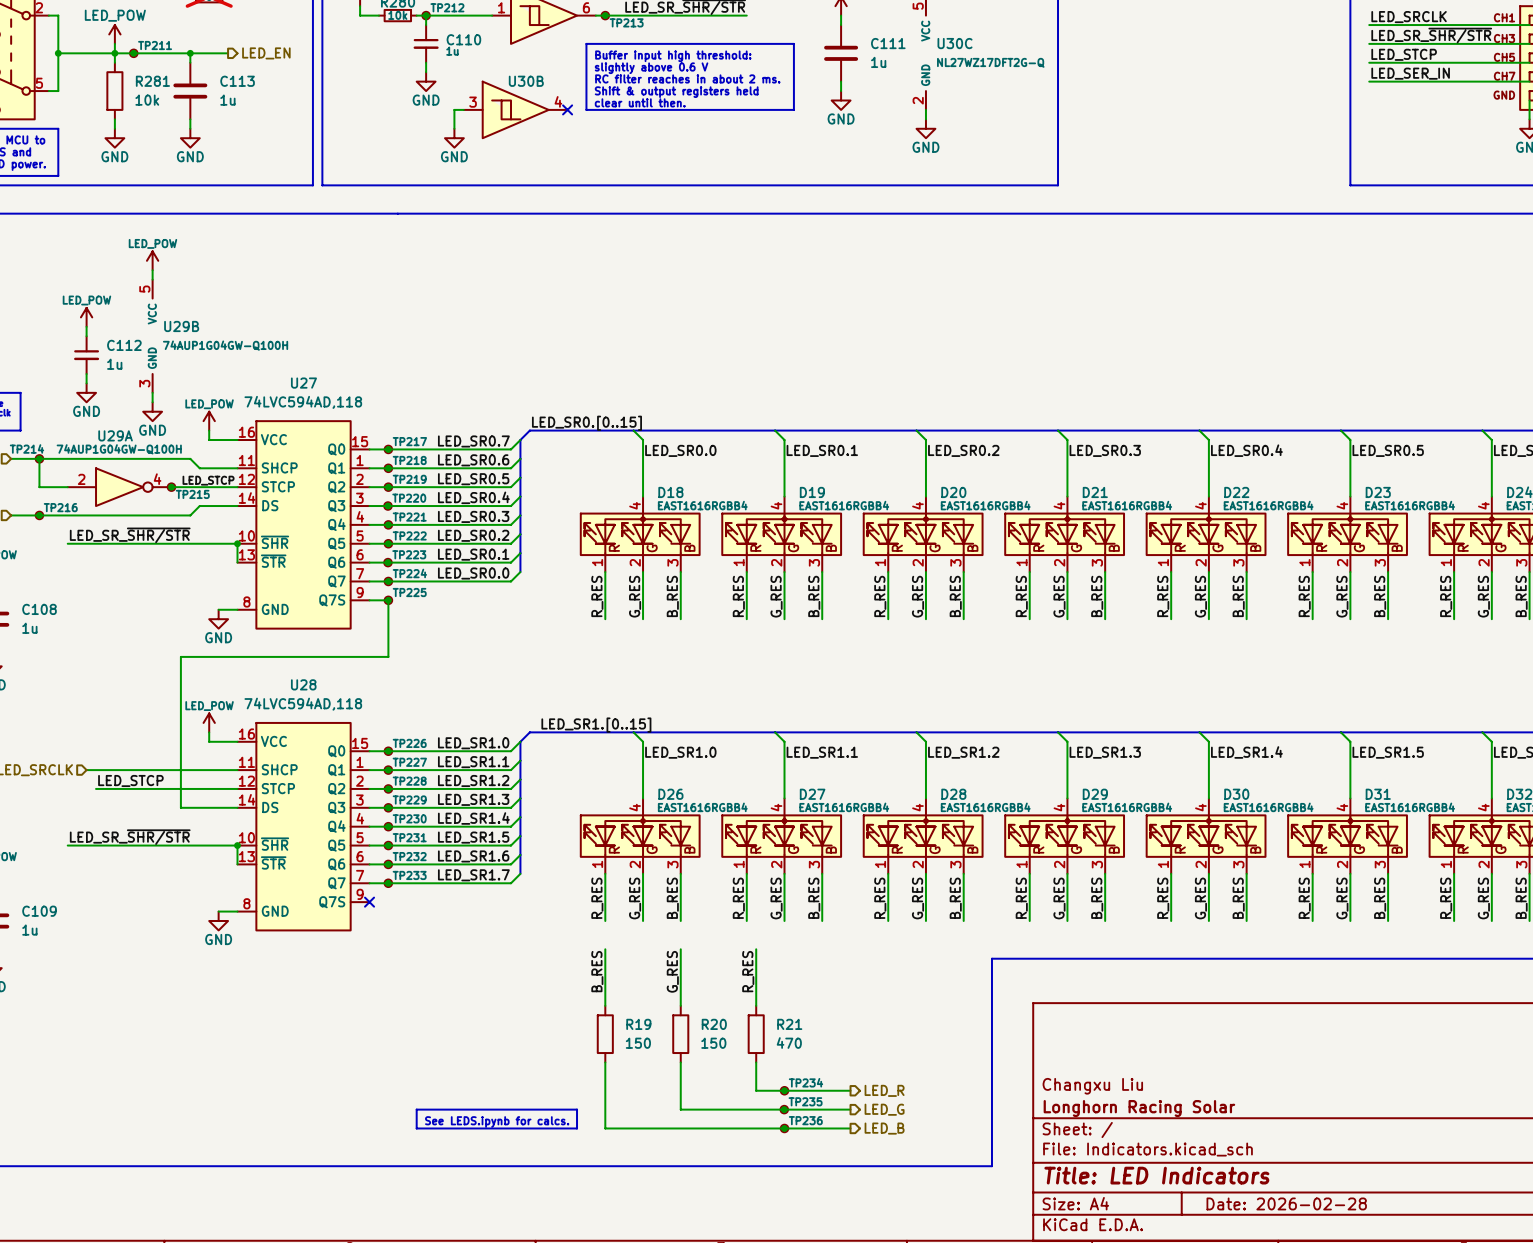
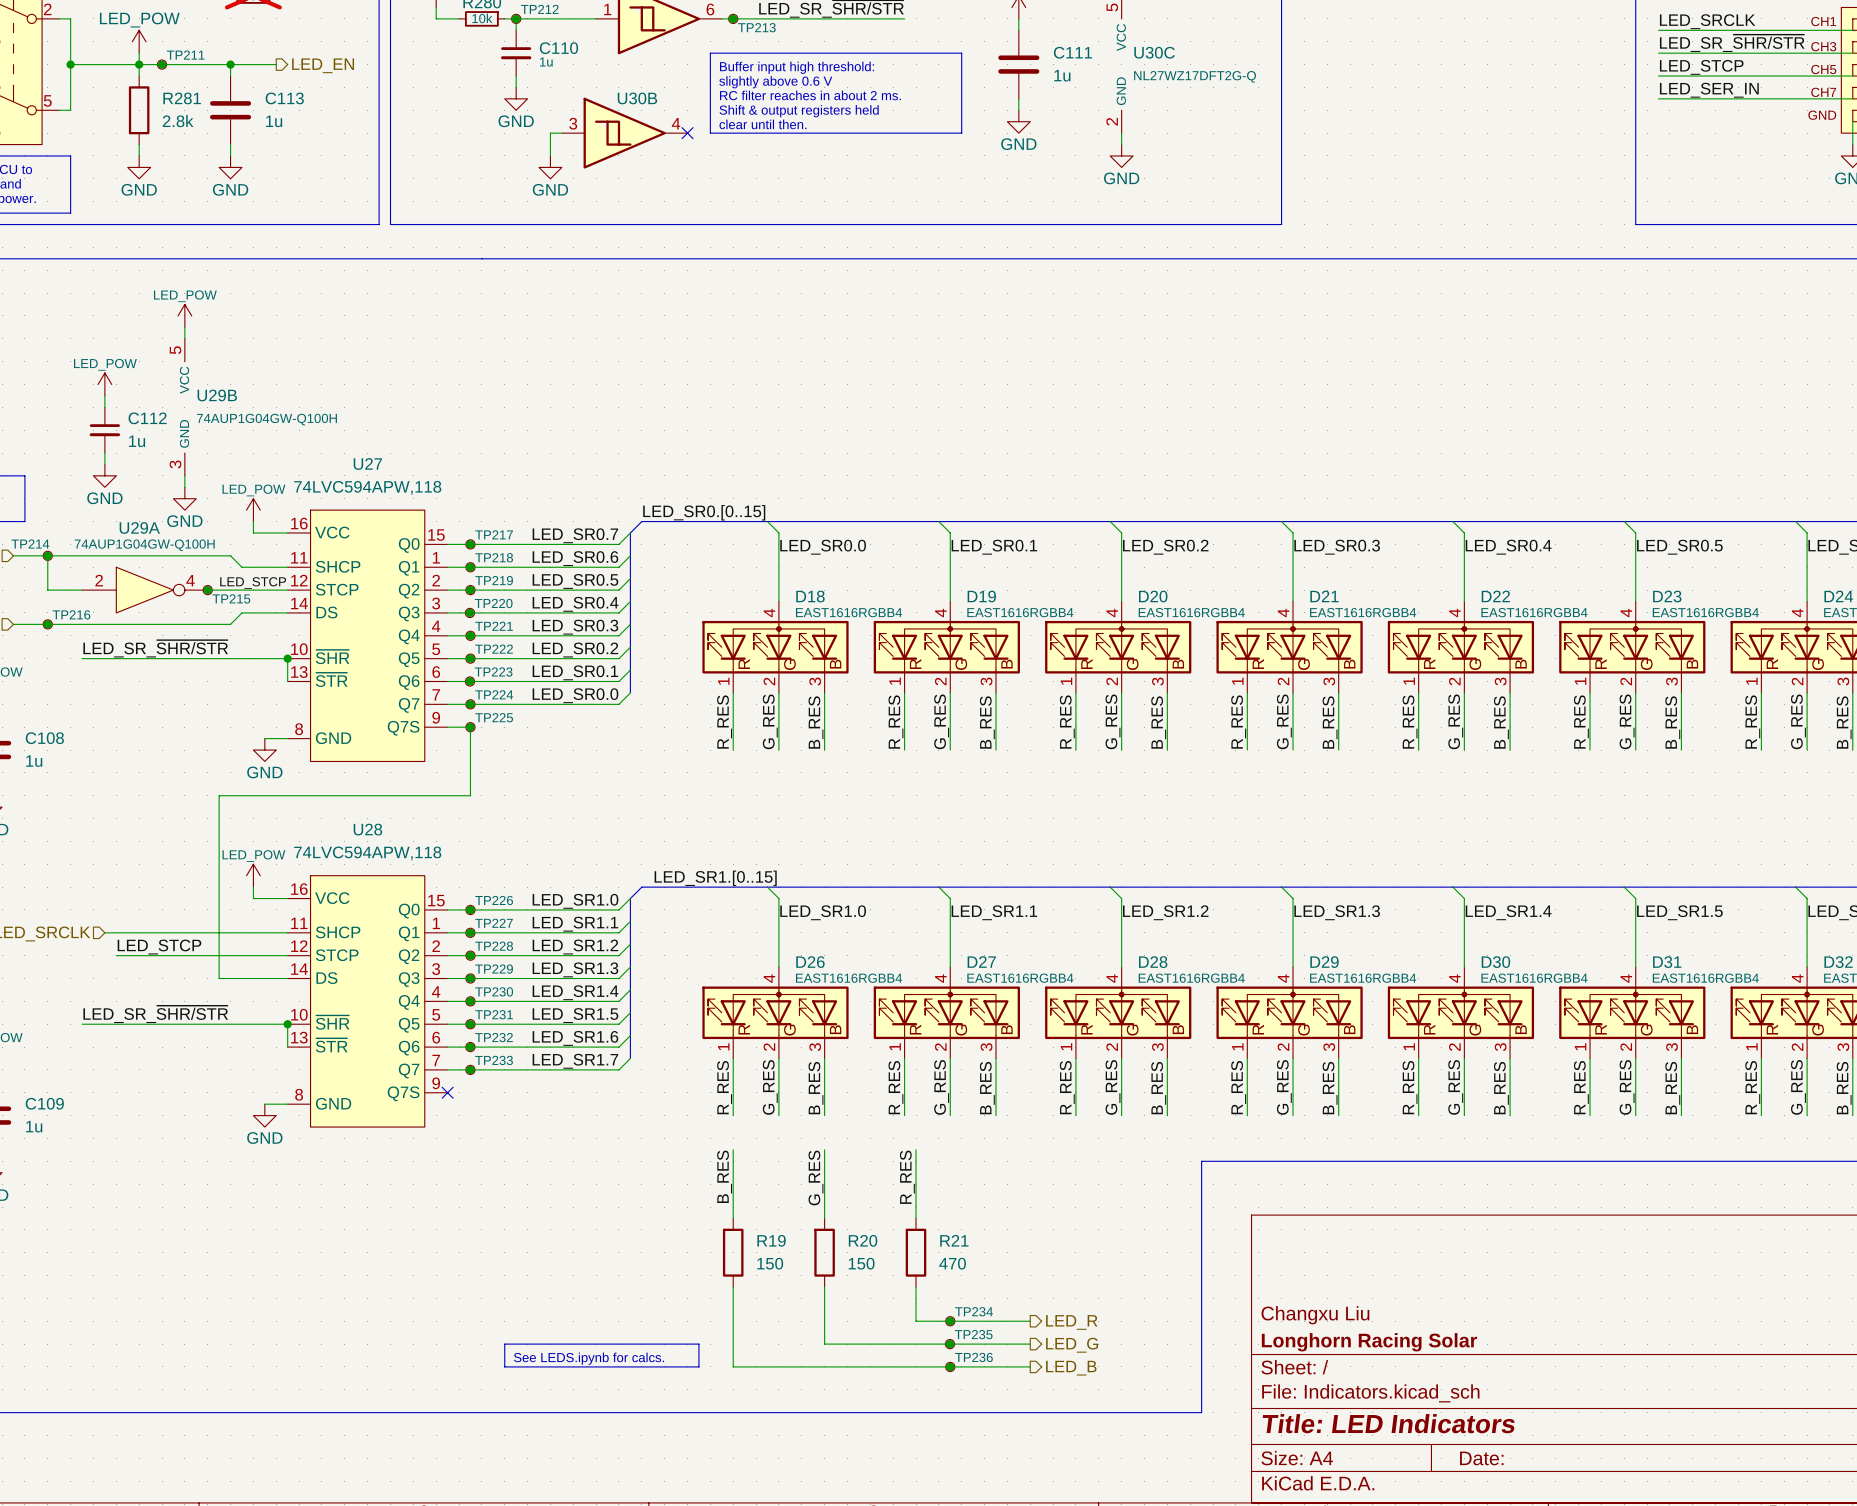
R281 value: 10k (147, 100) -> 2.8k (178, 121)
U27 value: 74LVC594AD,118 (303, 402) -> 74LVC594APW,118 (367, 487)
U28 value: 74LVC594AD,118 (303, 704) -> 74LVC594APW,118 (367, 853)
title block: Date: 2026-02-28 (1286, 1203) -> Date: (1481, 1458)

